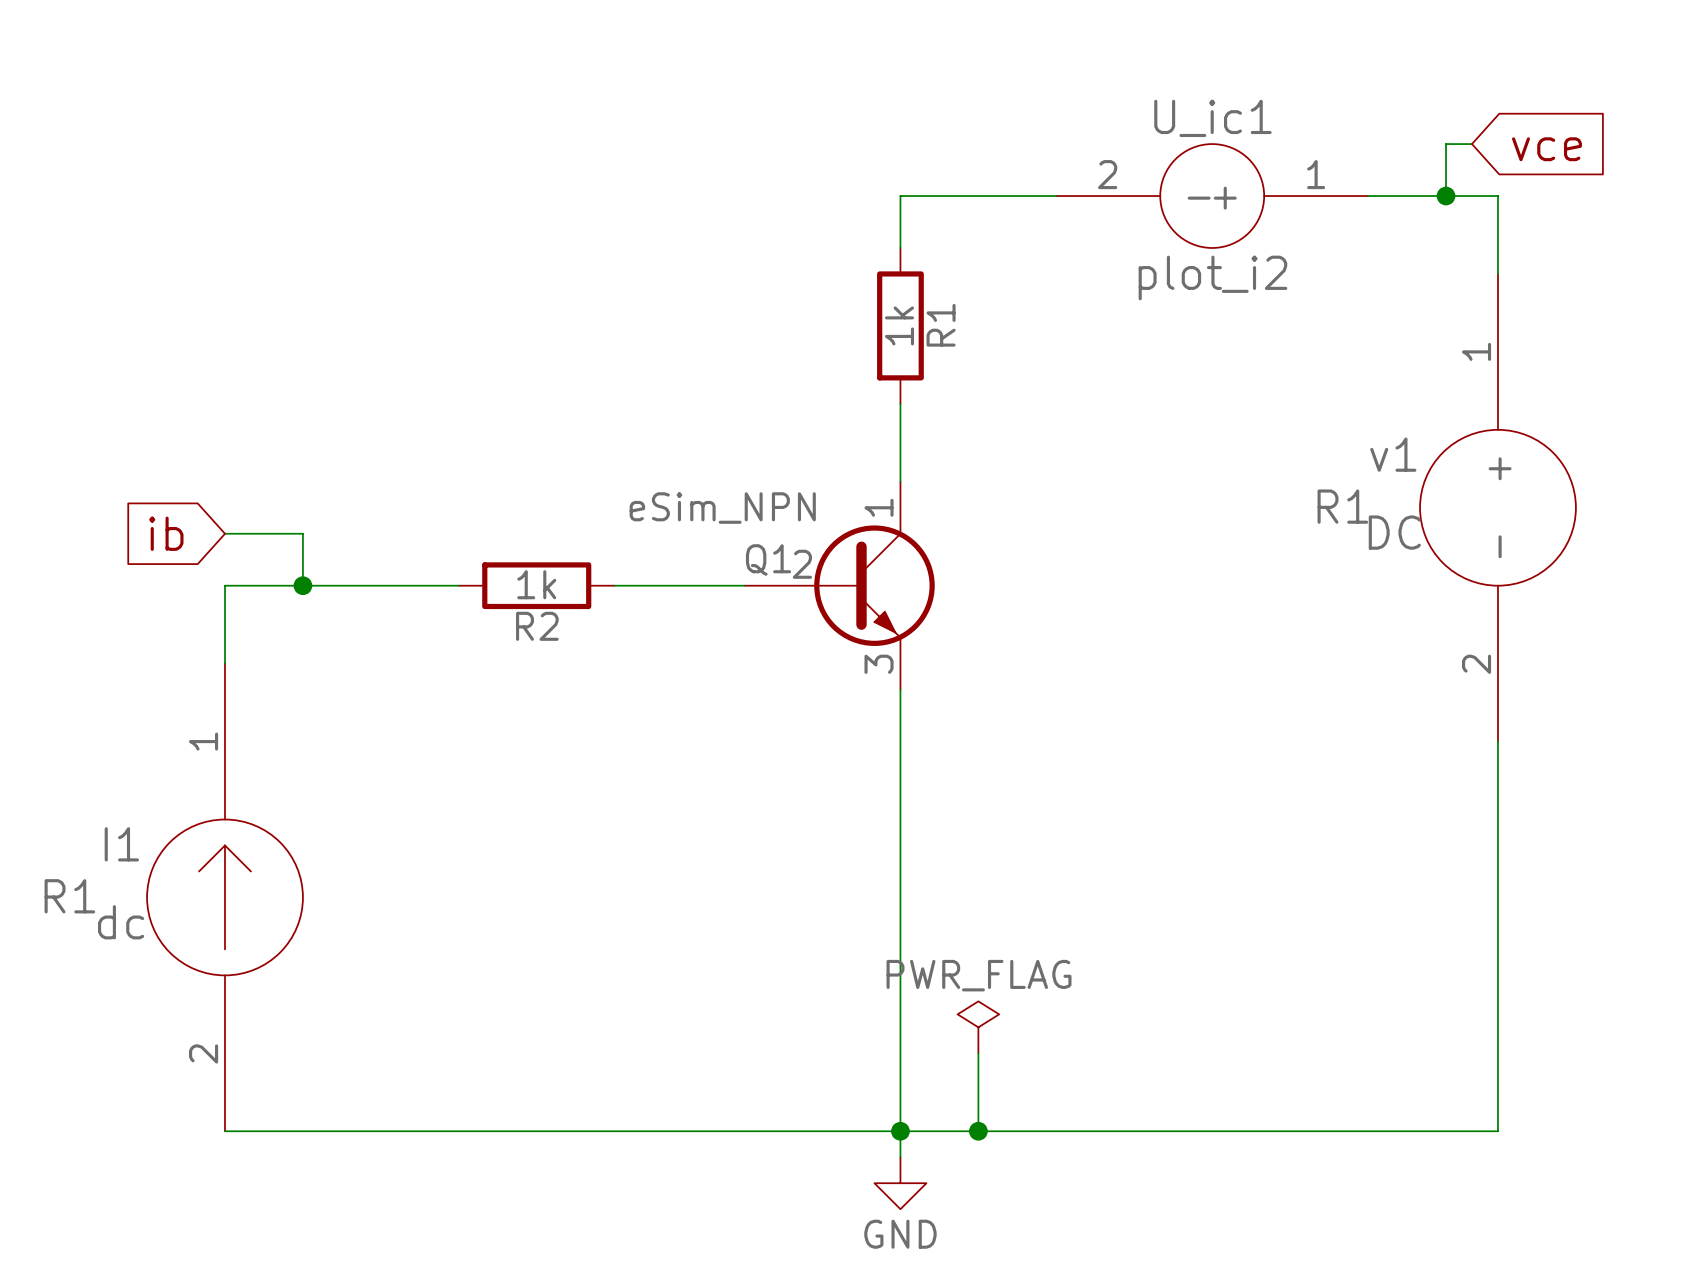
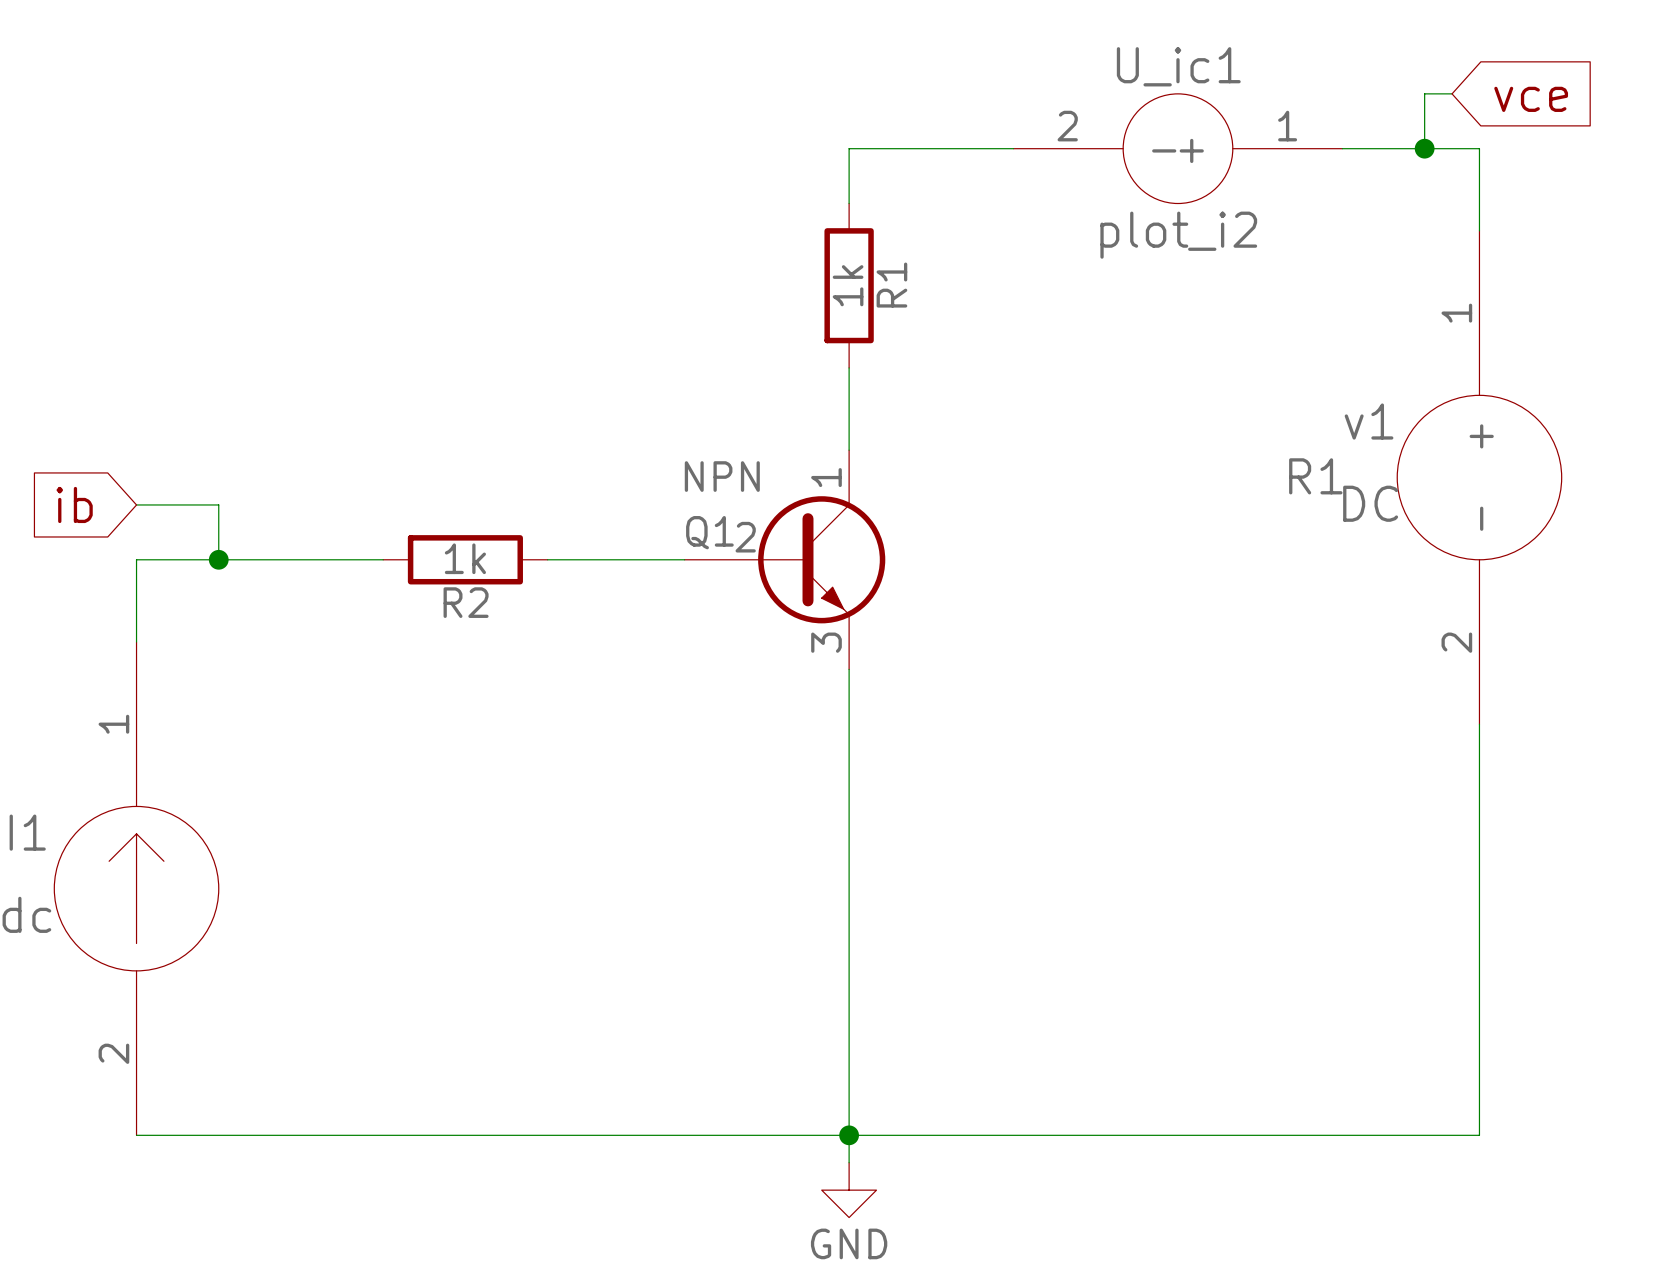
Q1 value: eSim_NPN (722, 508) -> NPN (722, 476)
power symbol: PWR_FLAG (978, 1027) -> none
wire: (978, 1053) (978, 1131) -> none
junction: (978, 1131) -> none

